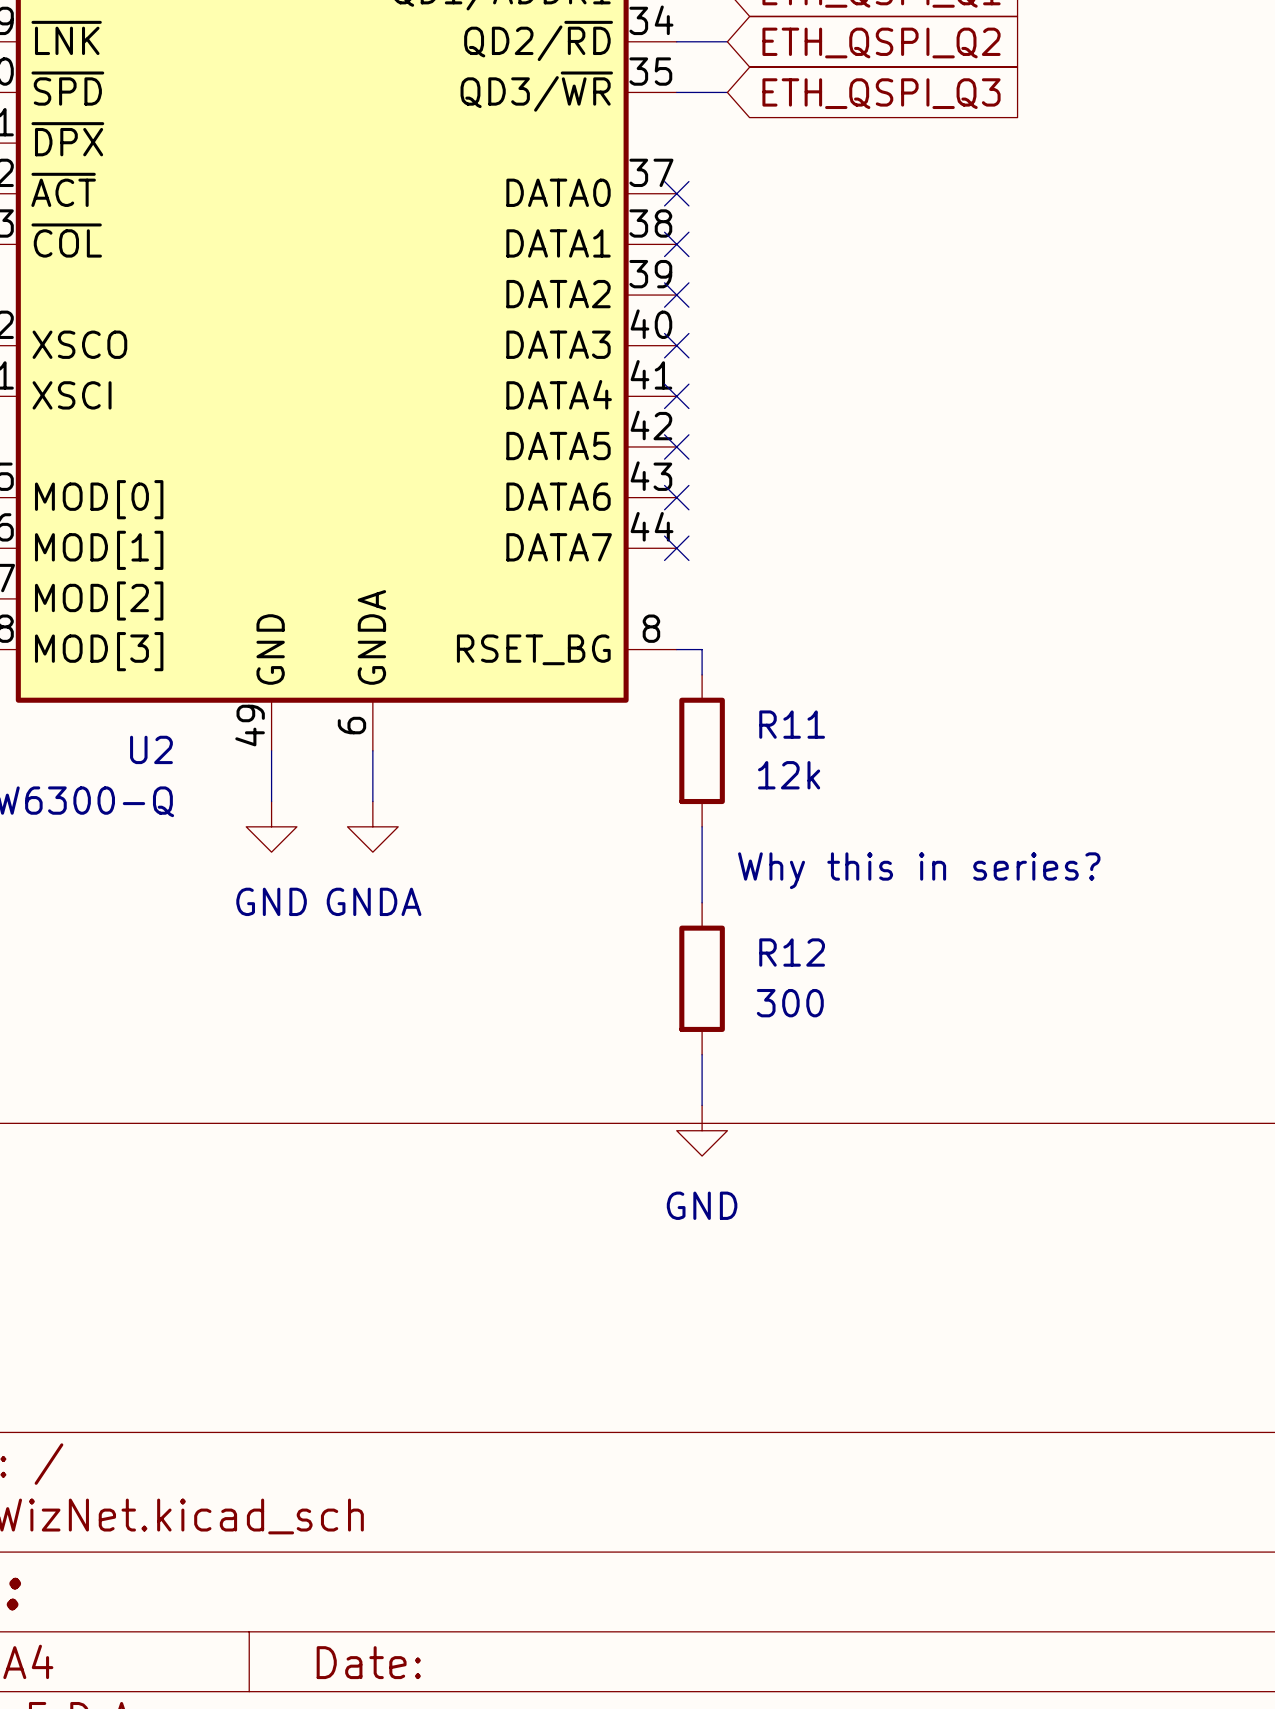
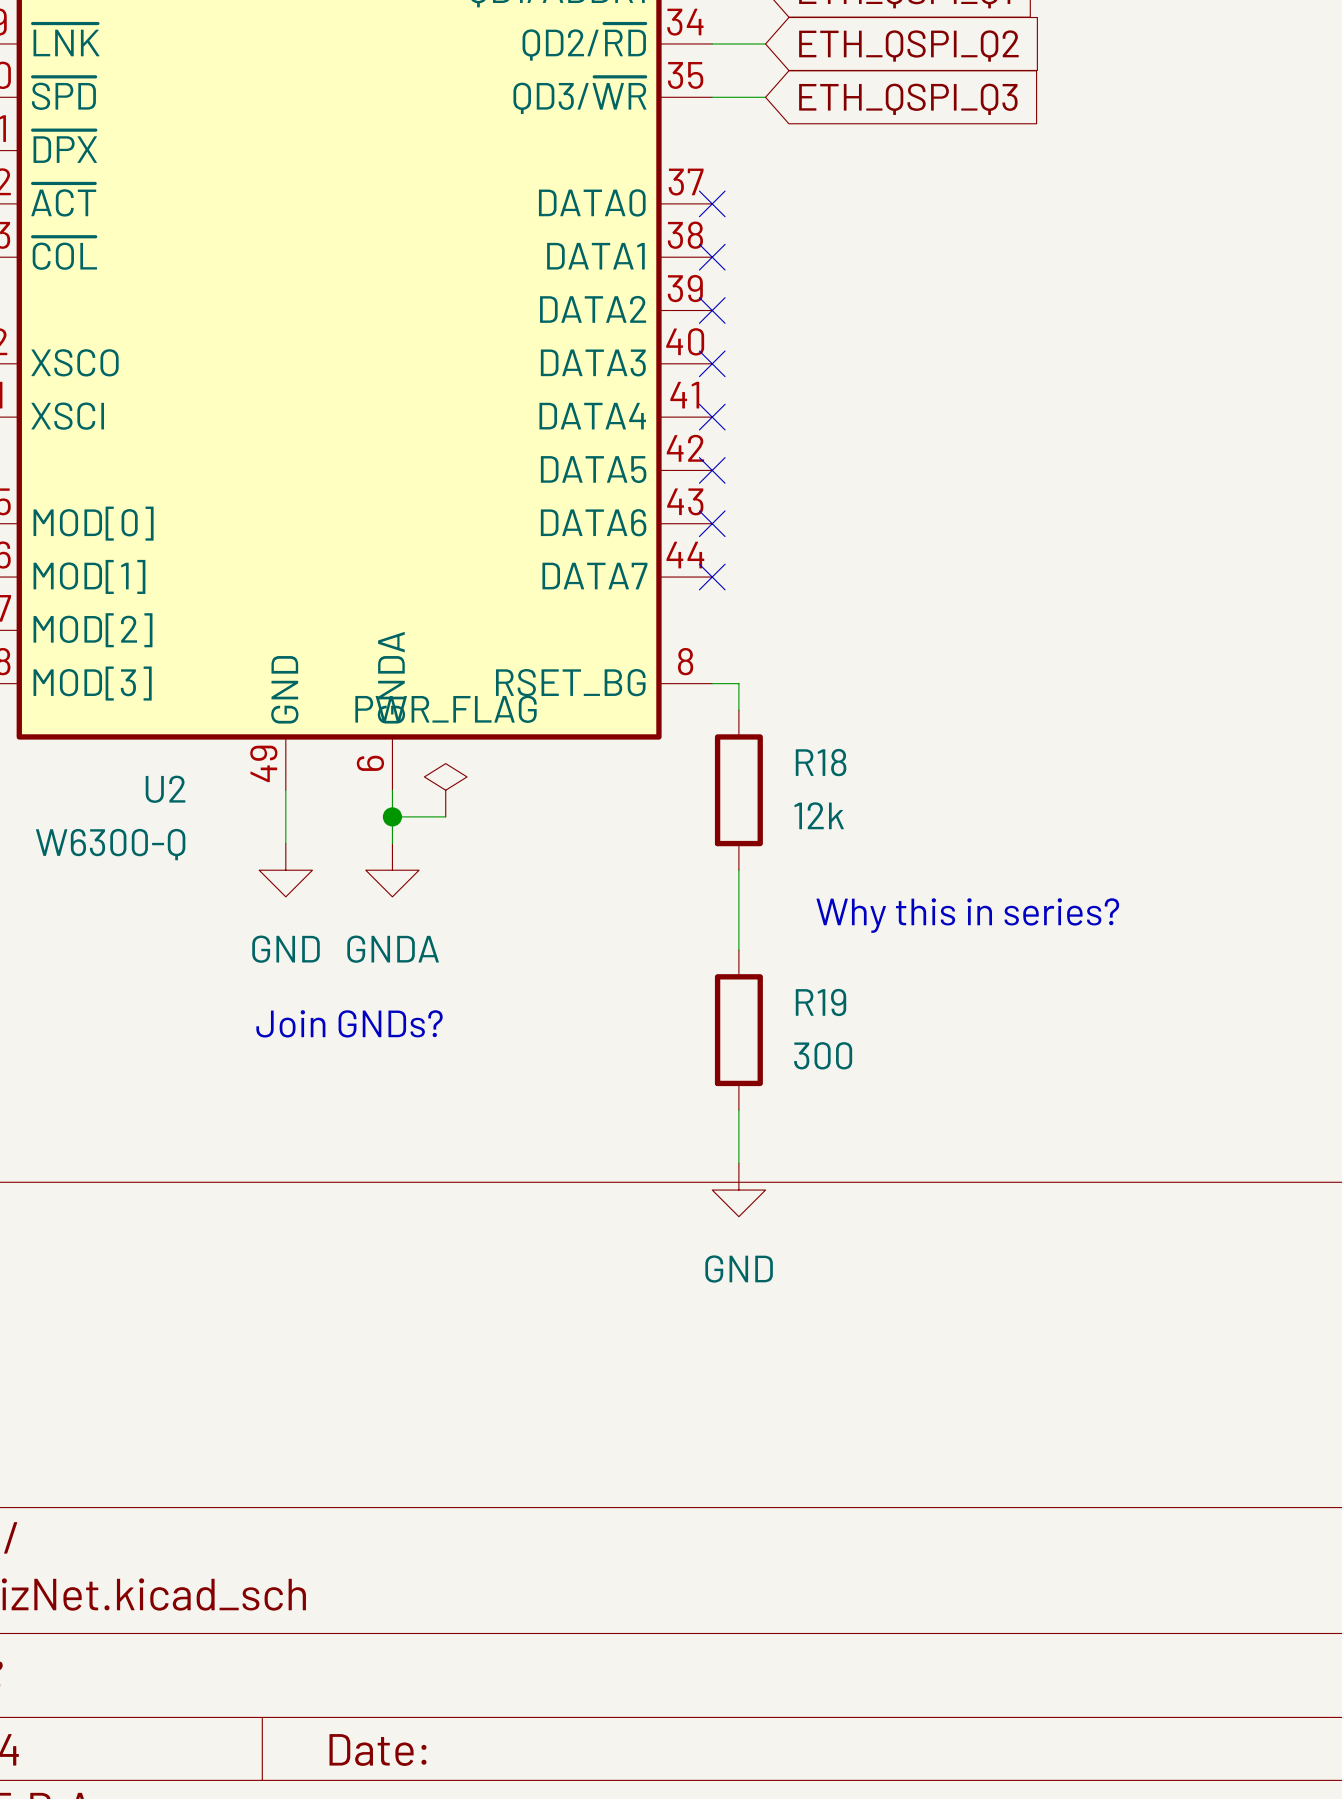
R11 name: R11 (792, 724) -> R18 (821, 762)
power symbol: none -> PWR_FLAG (445, 790)
wire: none -> (392, 816) (445, 816)
junction: none -> (392, 816)
R12 name: R12 (792, 952) -> R19 (820, 1002)
text: none -> Join GNDs? (349, 1023)

